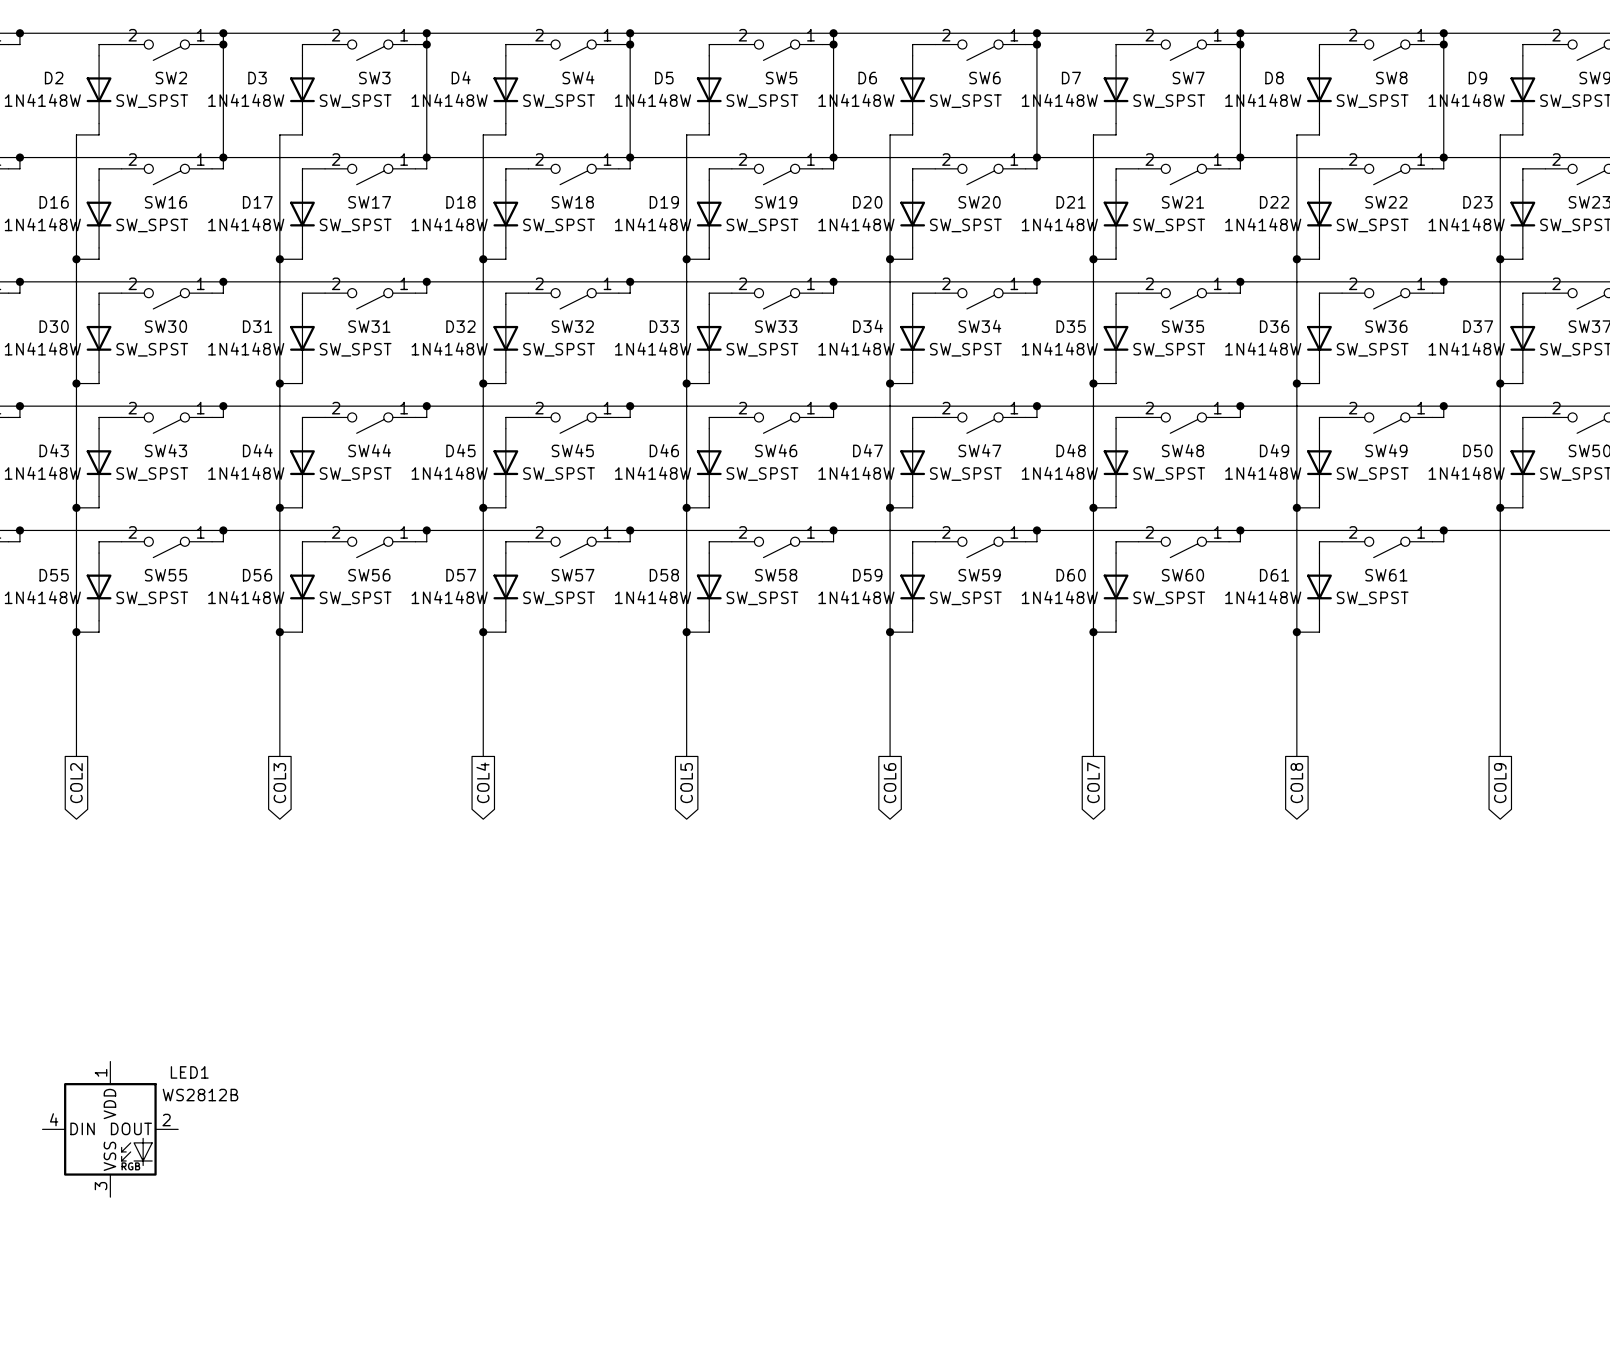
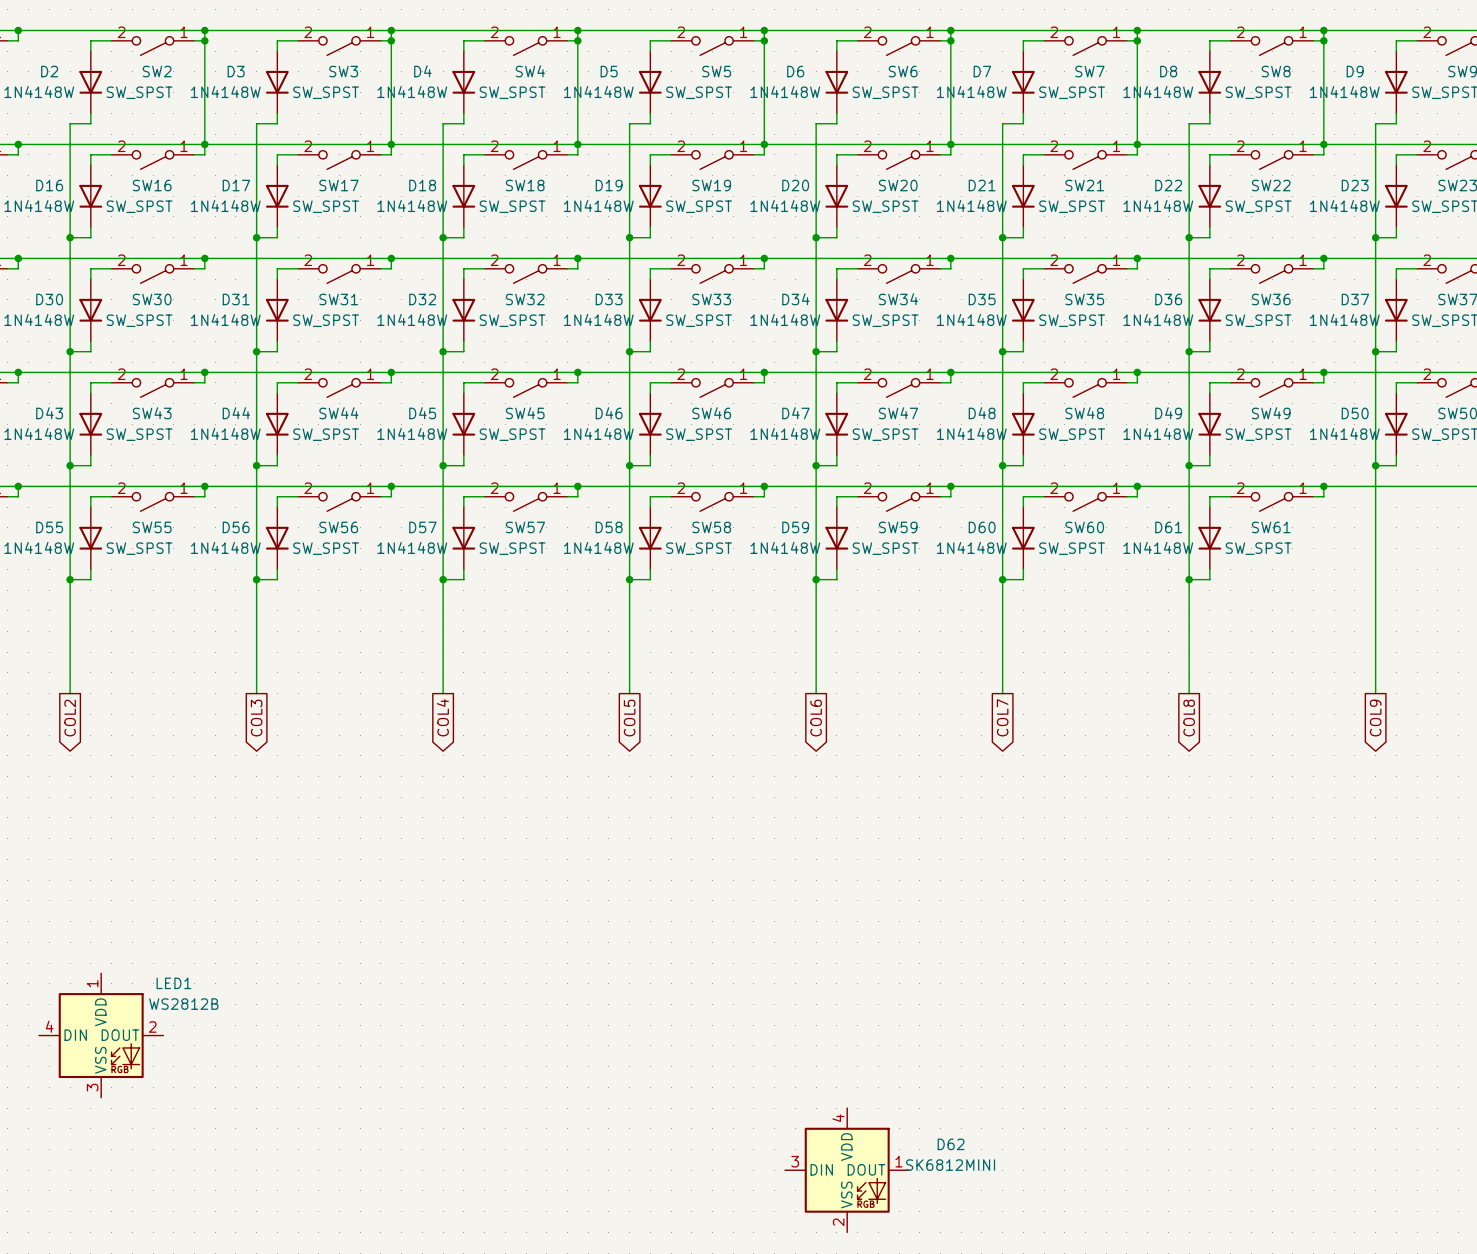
D62: none -> SK6812MINI (847, 1170)

